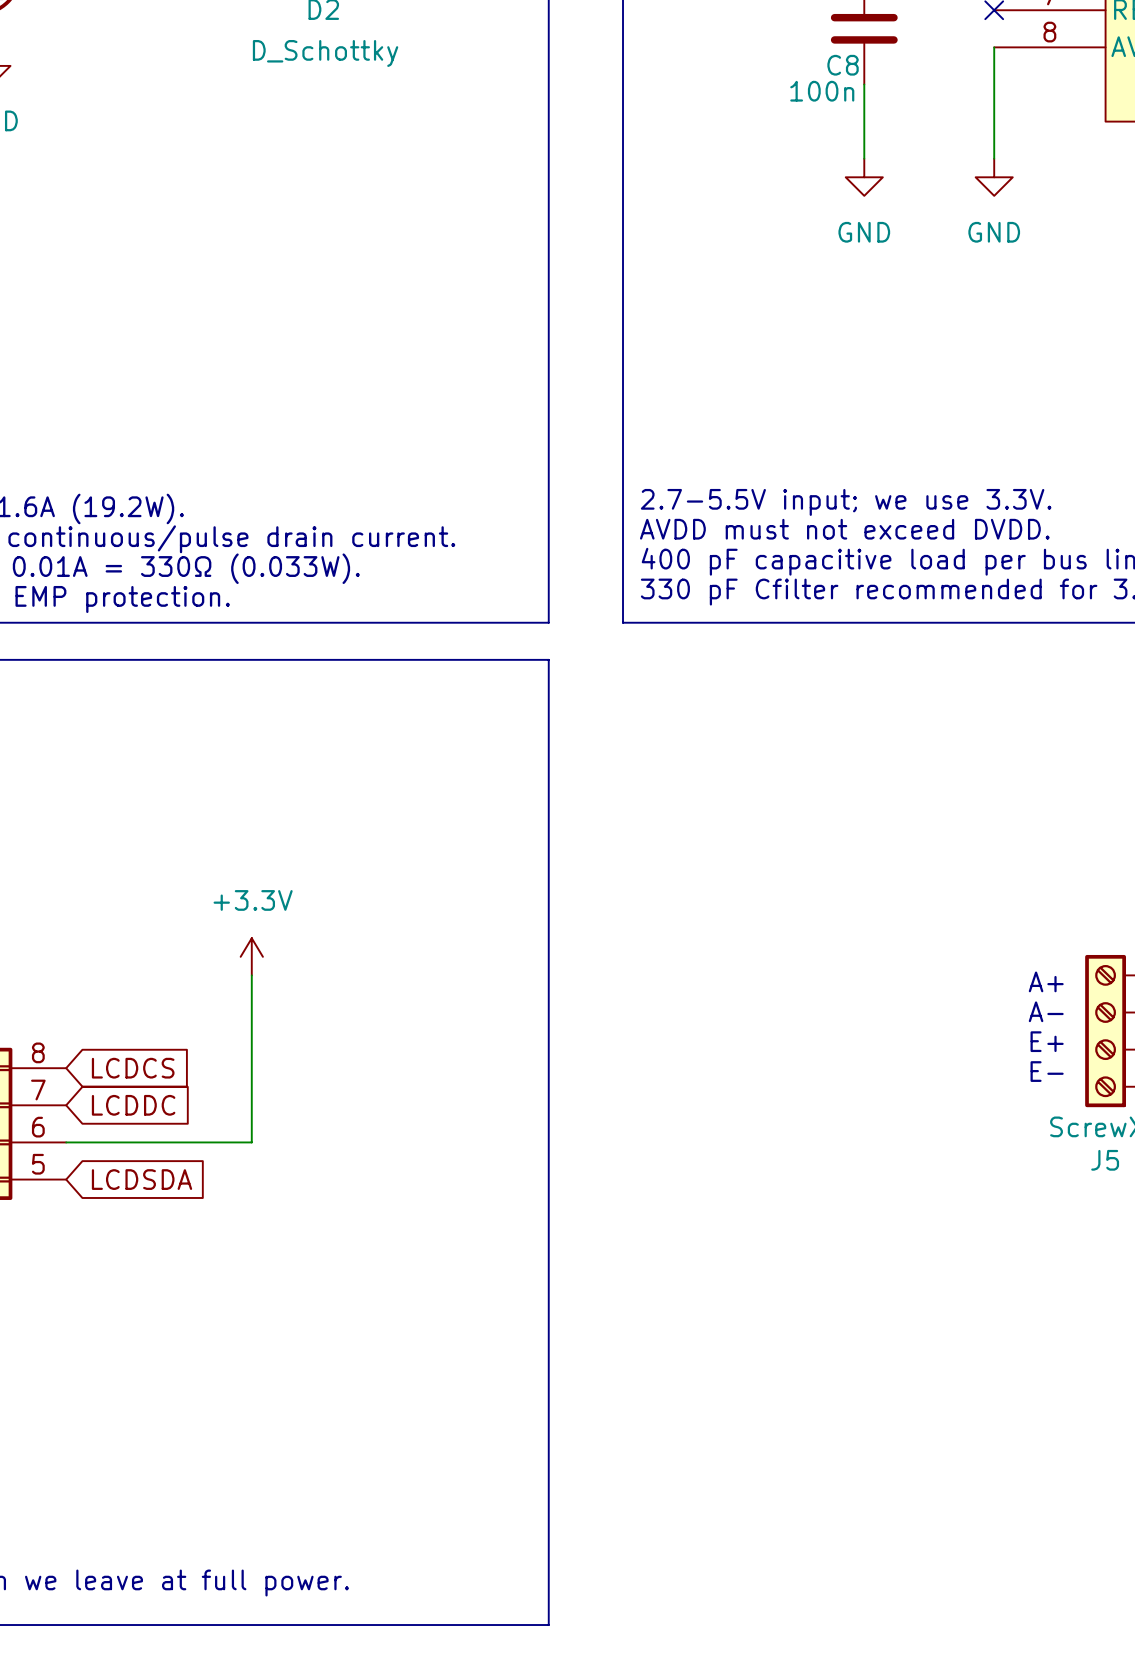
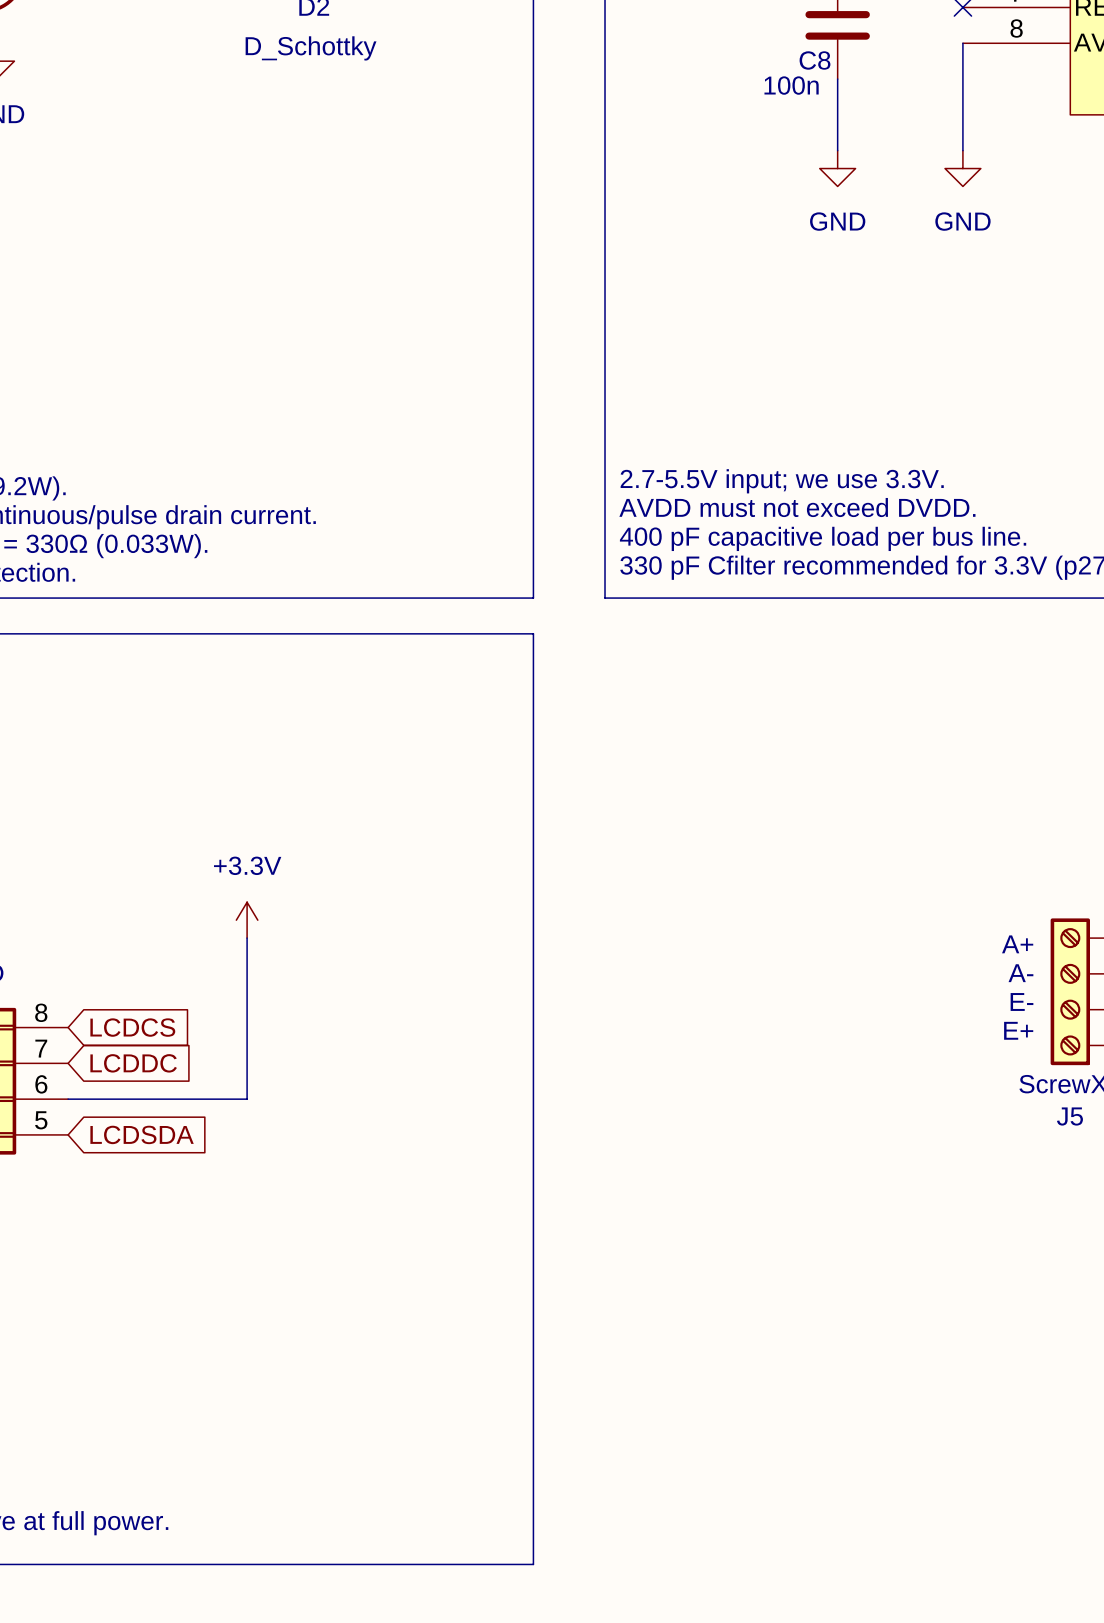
text: E+ (1047, 1041) -> E- (1022, 1001)
text: E- (1047, 1071) -> E+ (1018, 1030)

